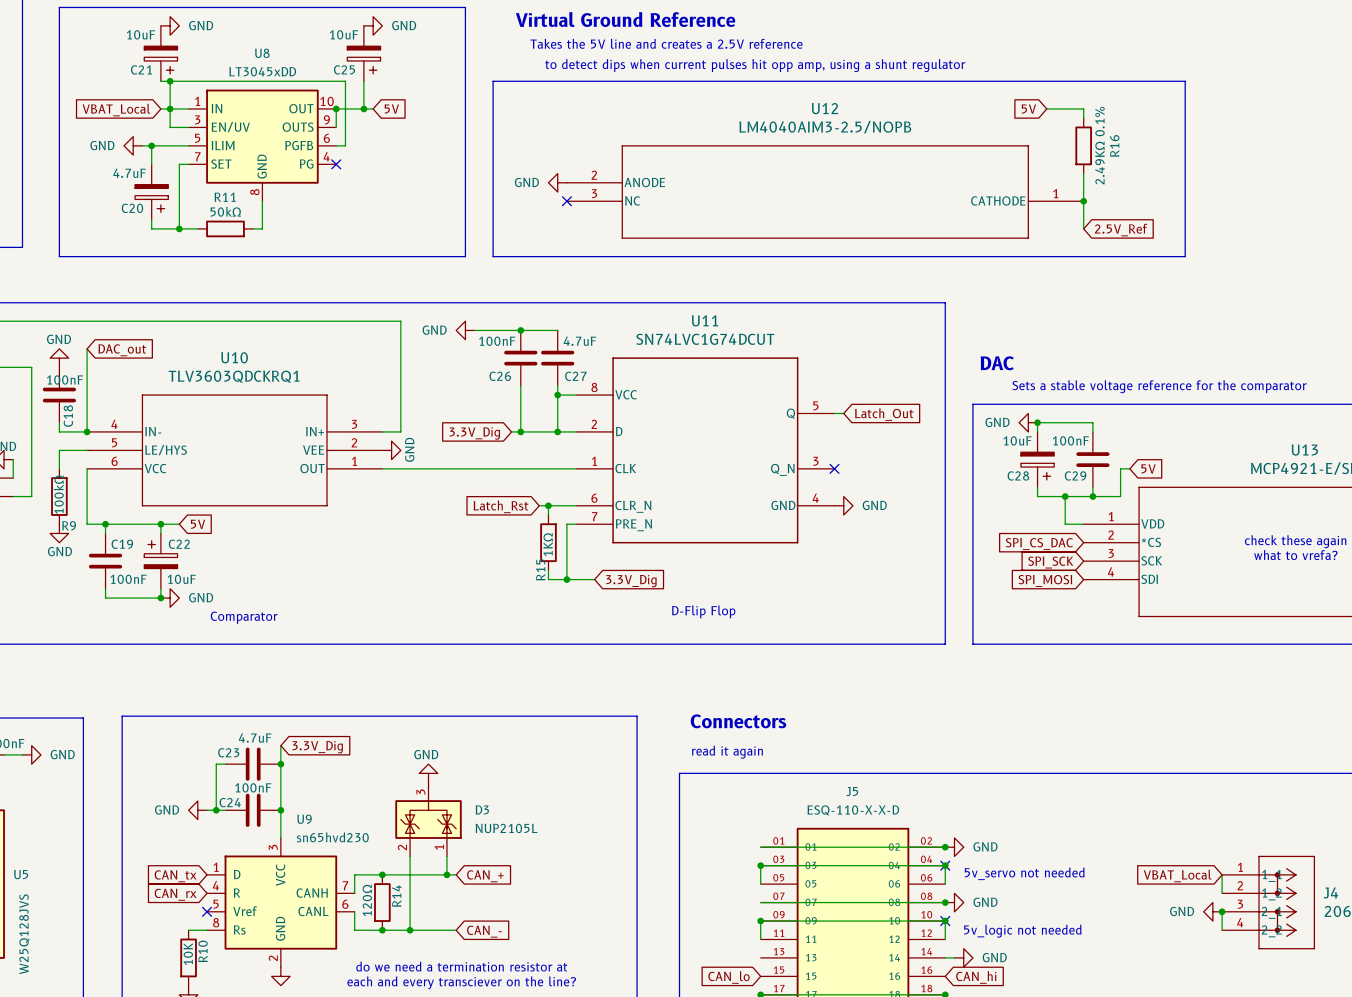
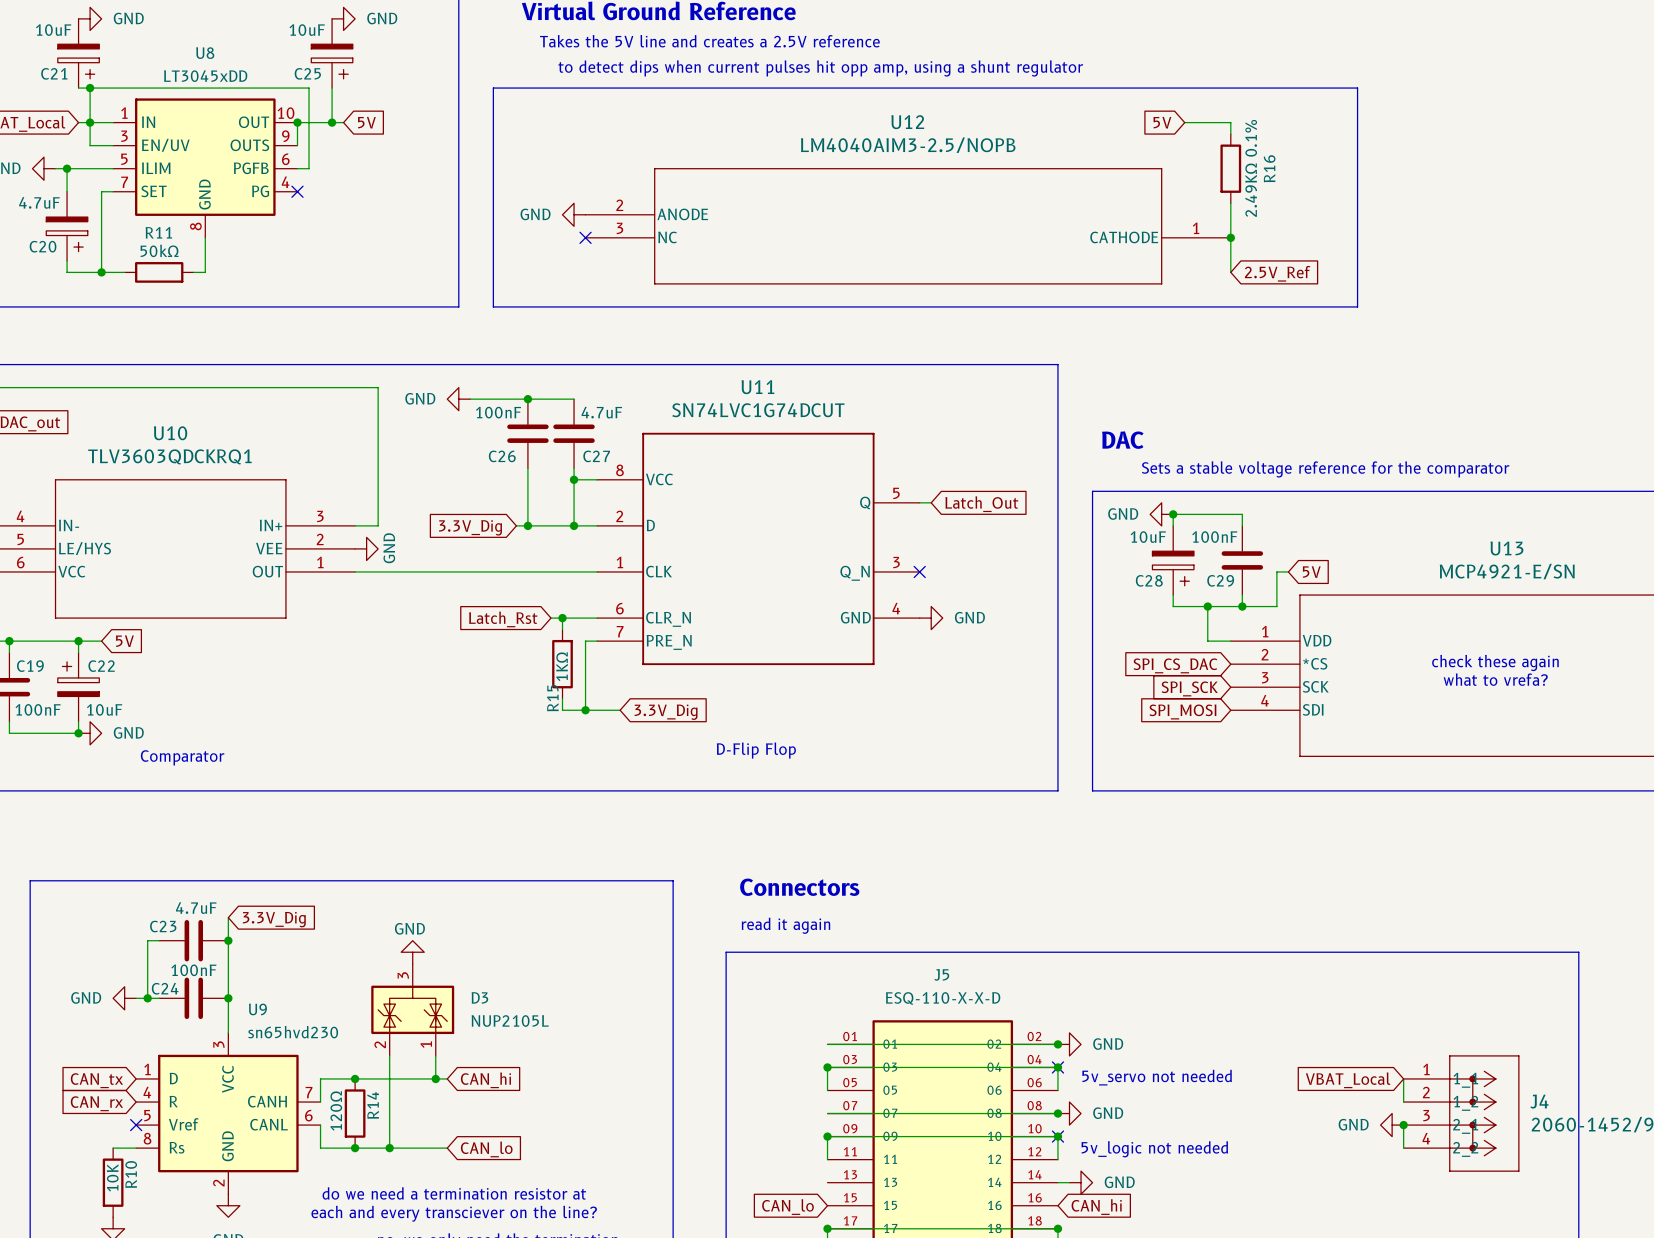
global label: CAN_+ (485, 876) -> CAN_hi (485, 1080)
global label: CAN_- (484, 931) -> CAN_lo (486, 1149)

